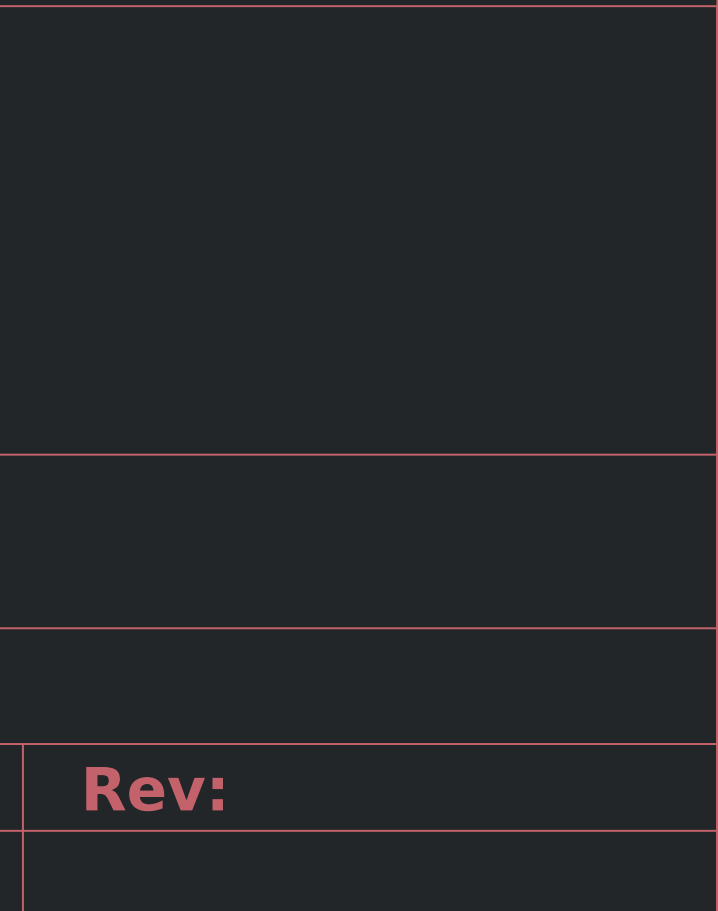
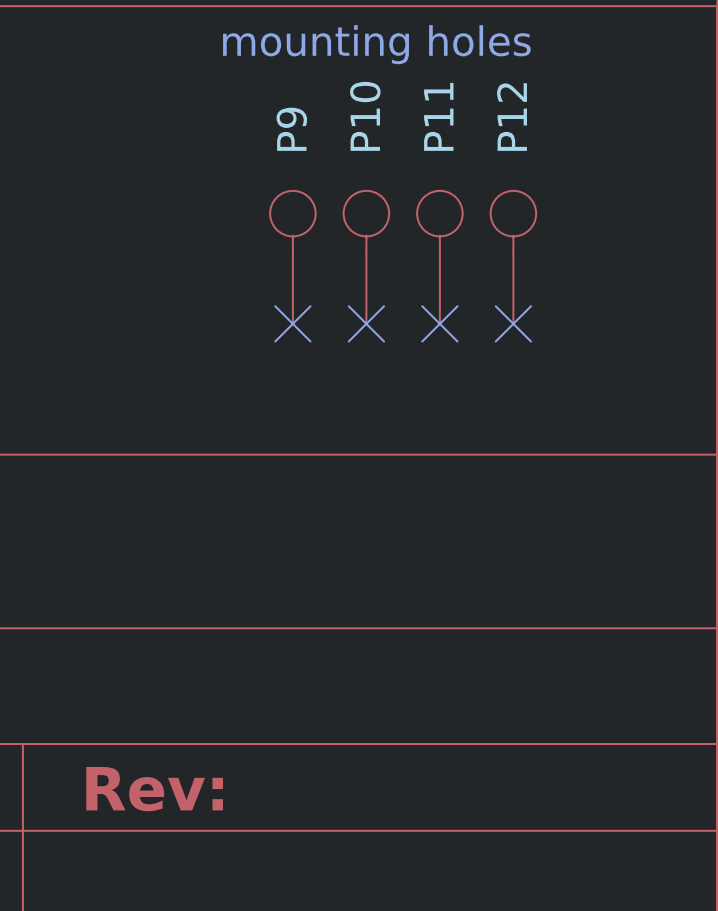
text: none -> mounting holes (376, 44)
P9: none -> (292, 257)
P10: none -> (366, 257)
P11: none -> (439, 257)
P12: none -> (513, 257)
no-connect mark: none -> (292, 323)
no-connect mark: none -> (366, 323)
no-connect mark: none -> (439, 323)
no-connect mark: none -> (513, 323)

